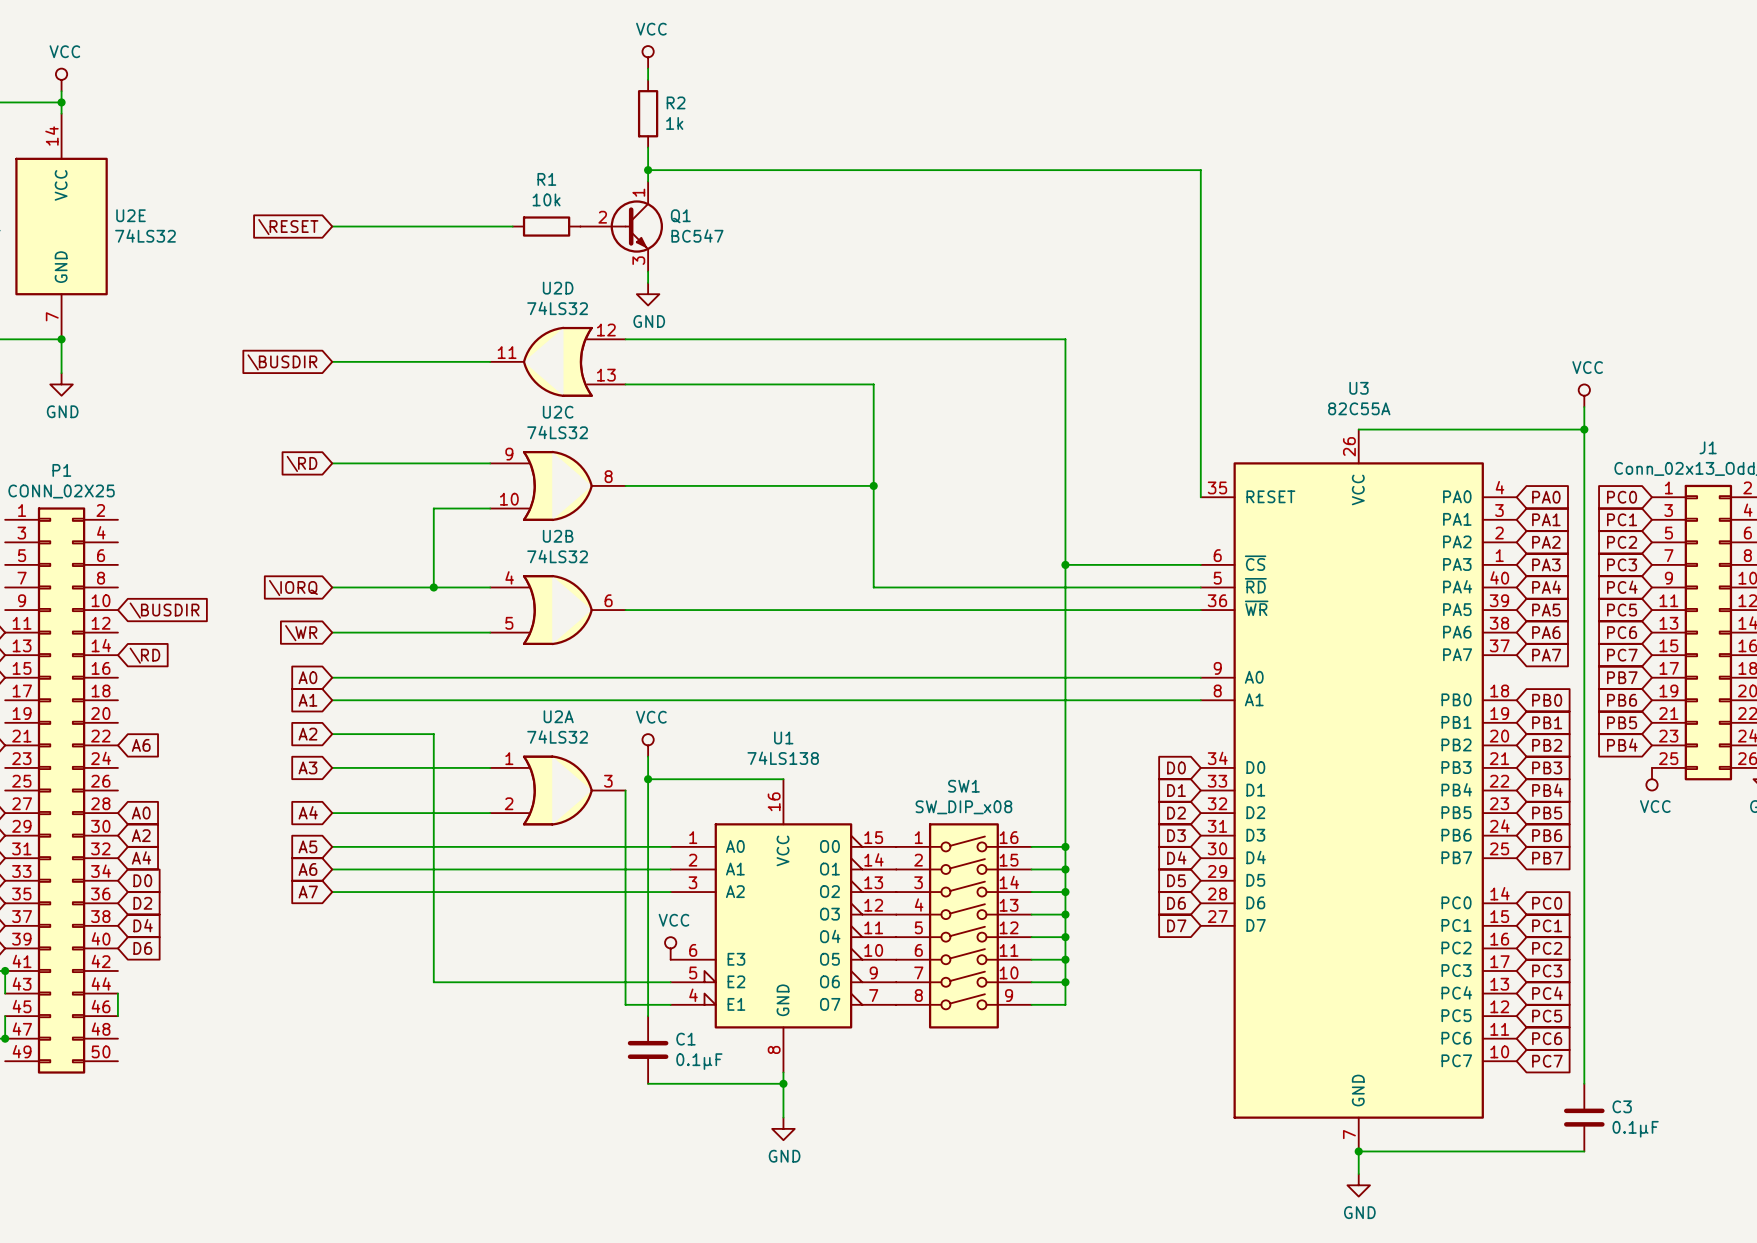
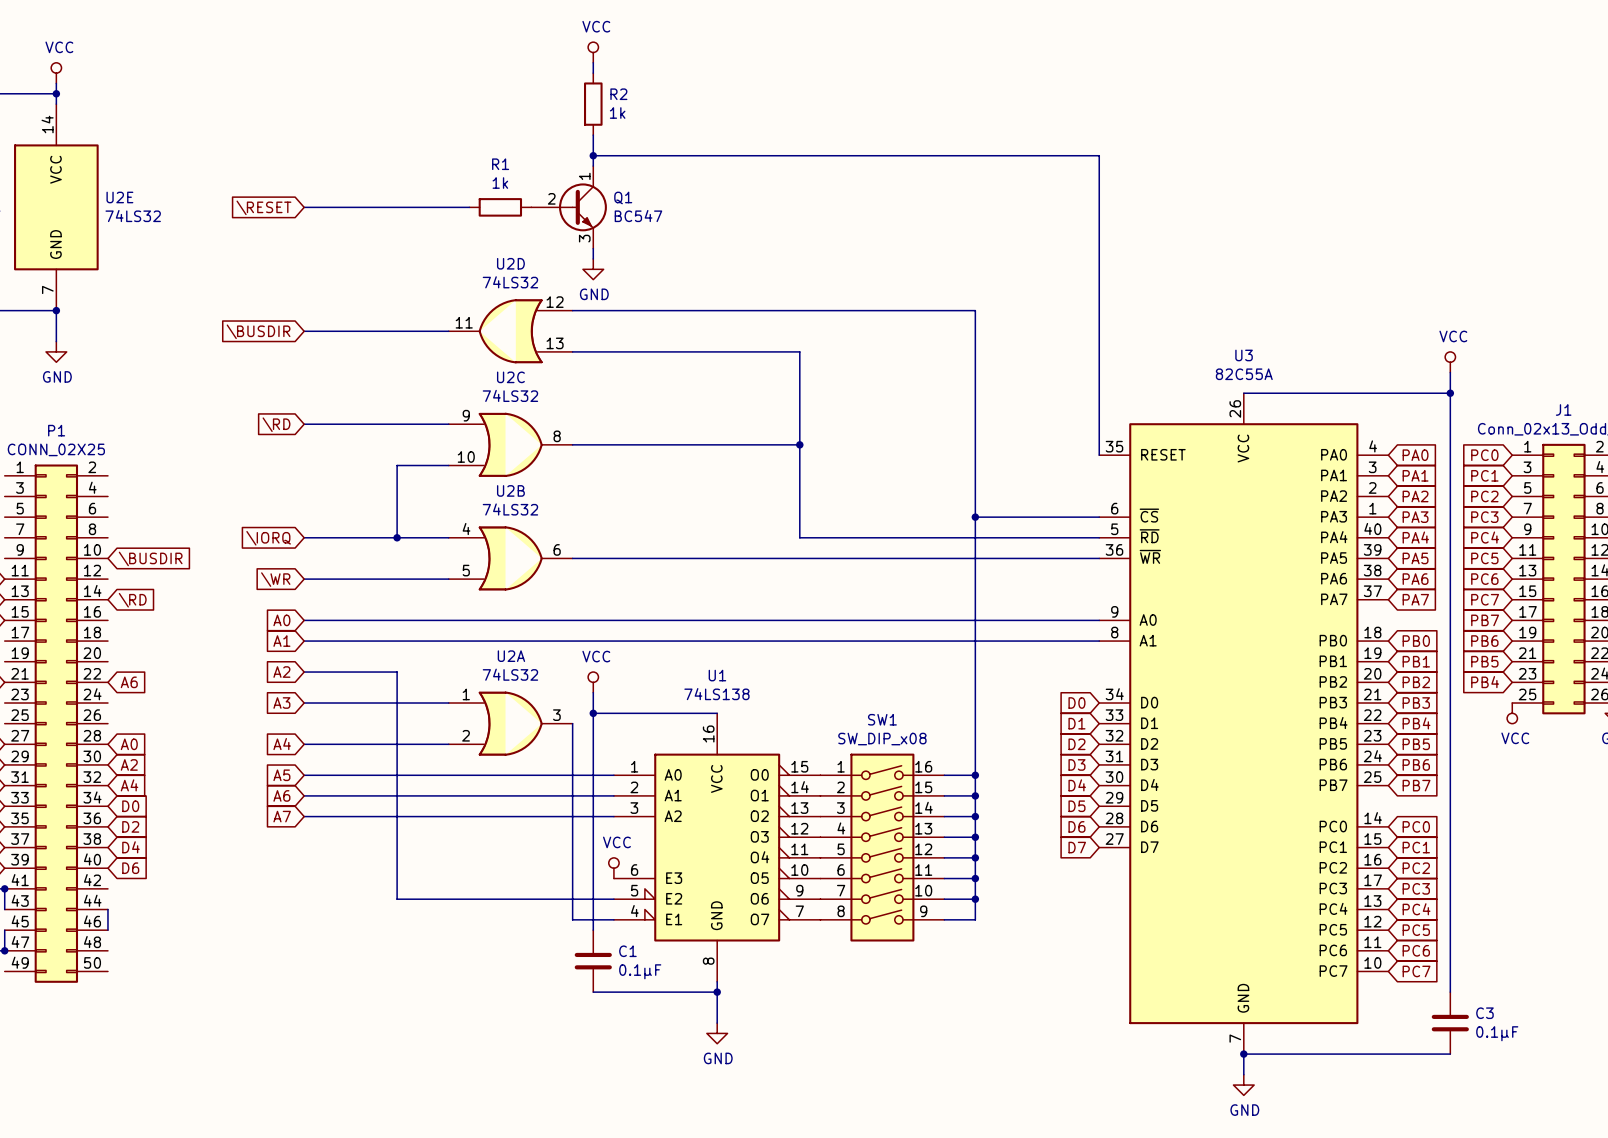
R1 value: 10k (546, 199) -> 1k (500, 183)

